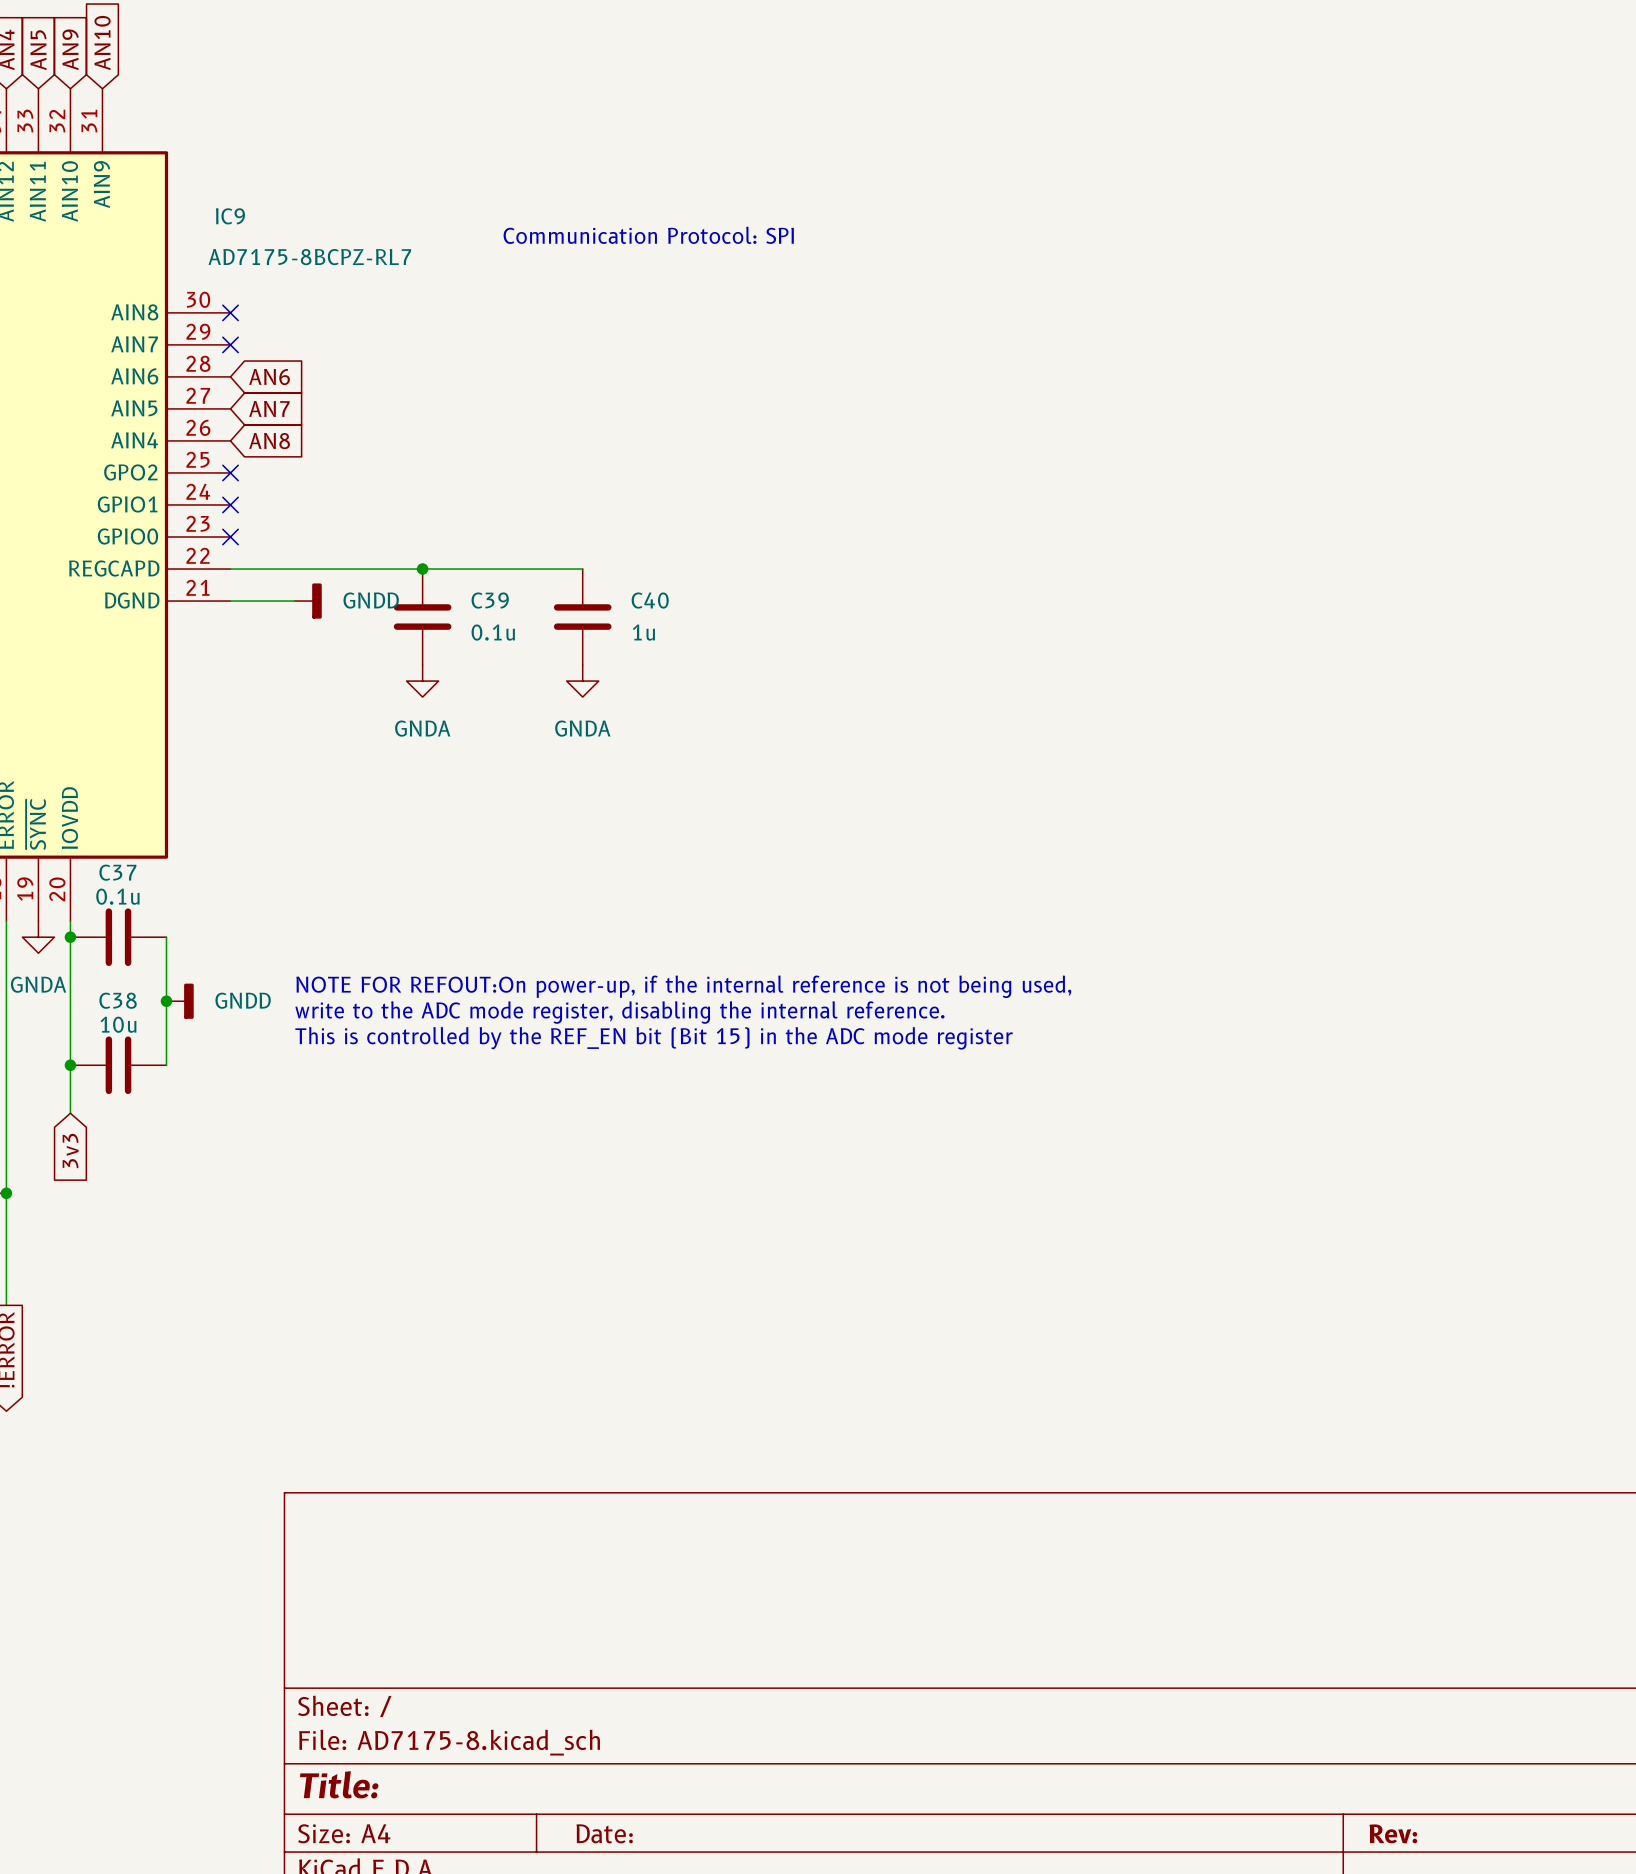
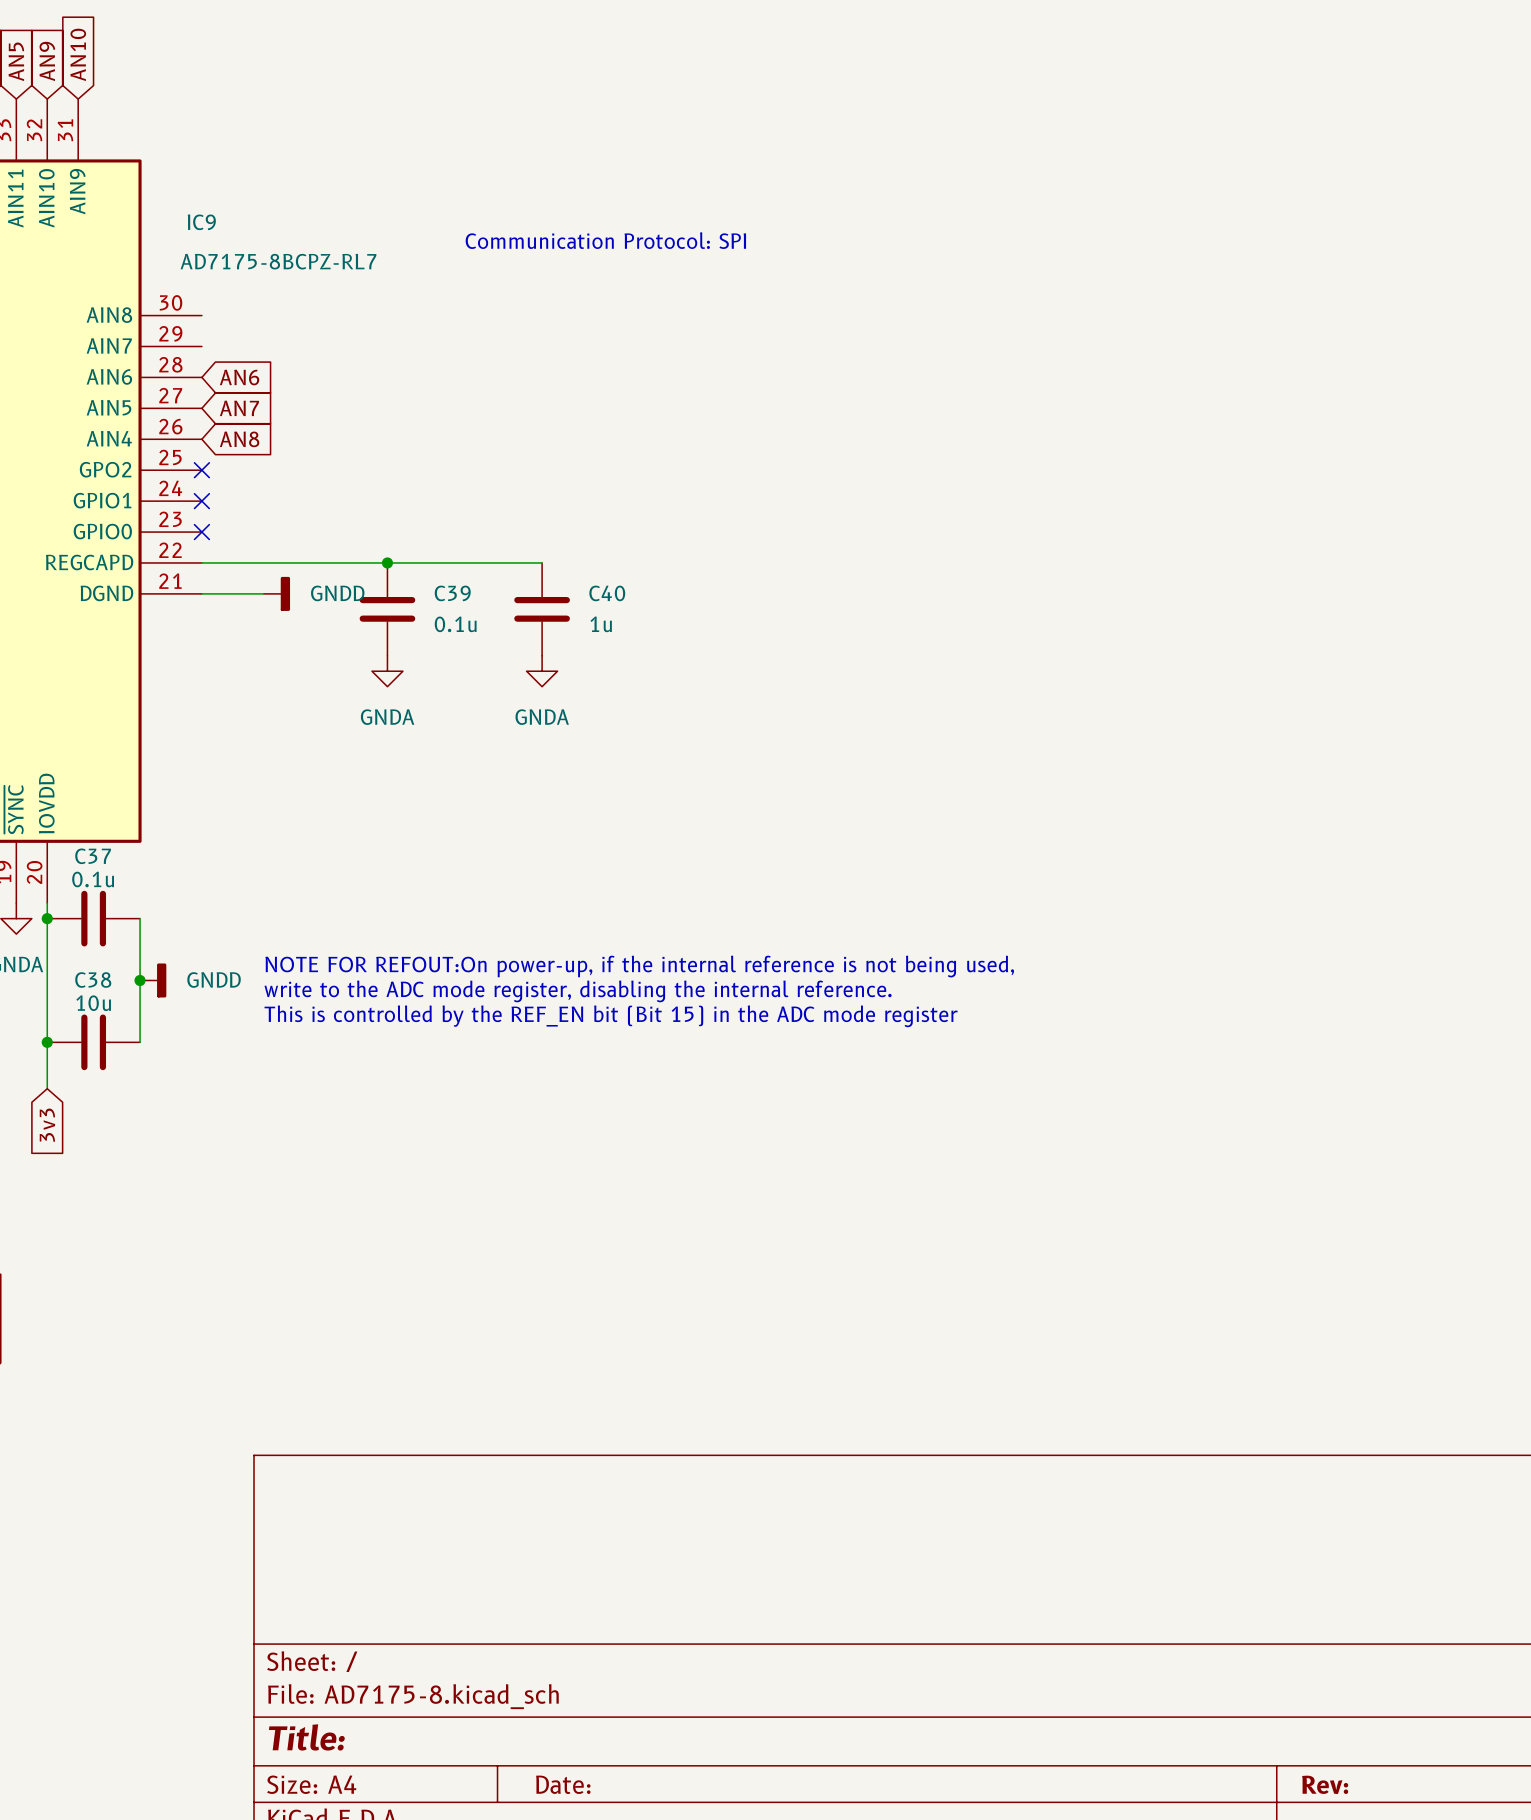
no-connect mark: (230, 312) -> none
no-connect mark: (230, 344) -> none

